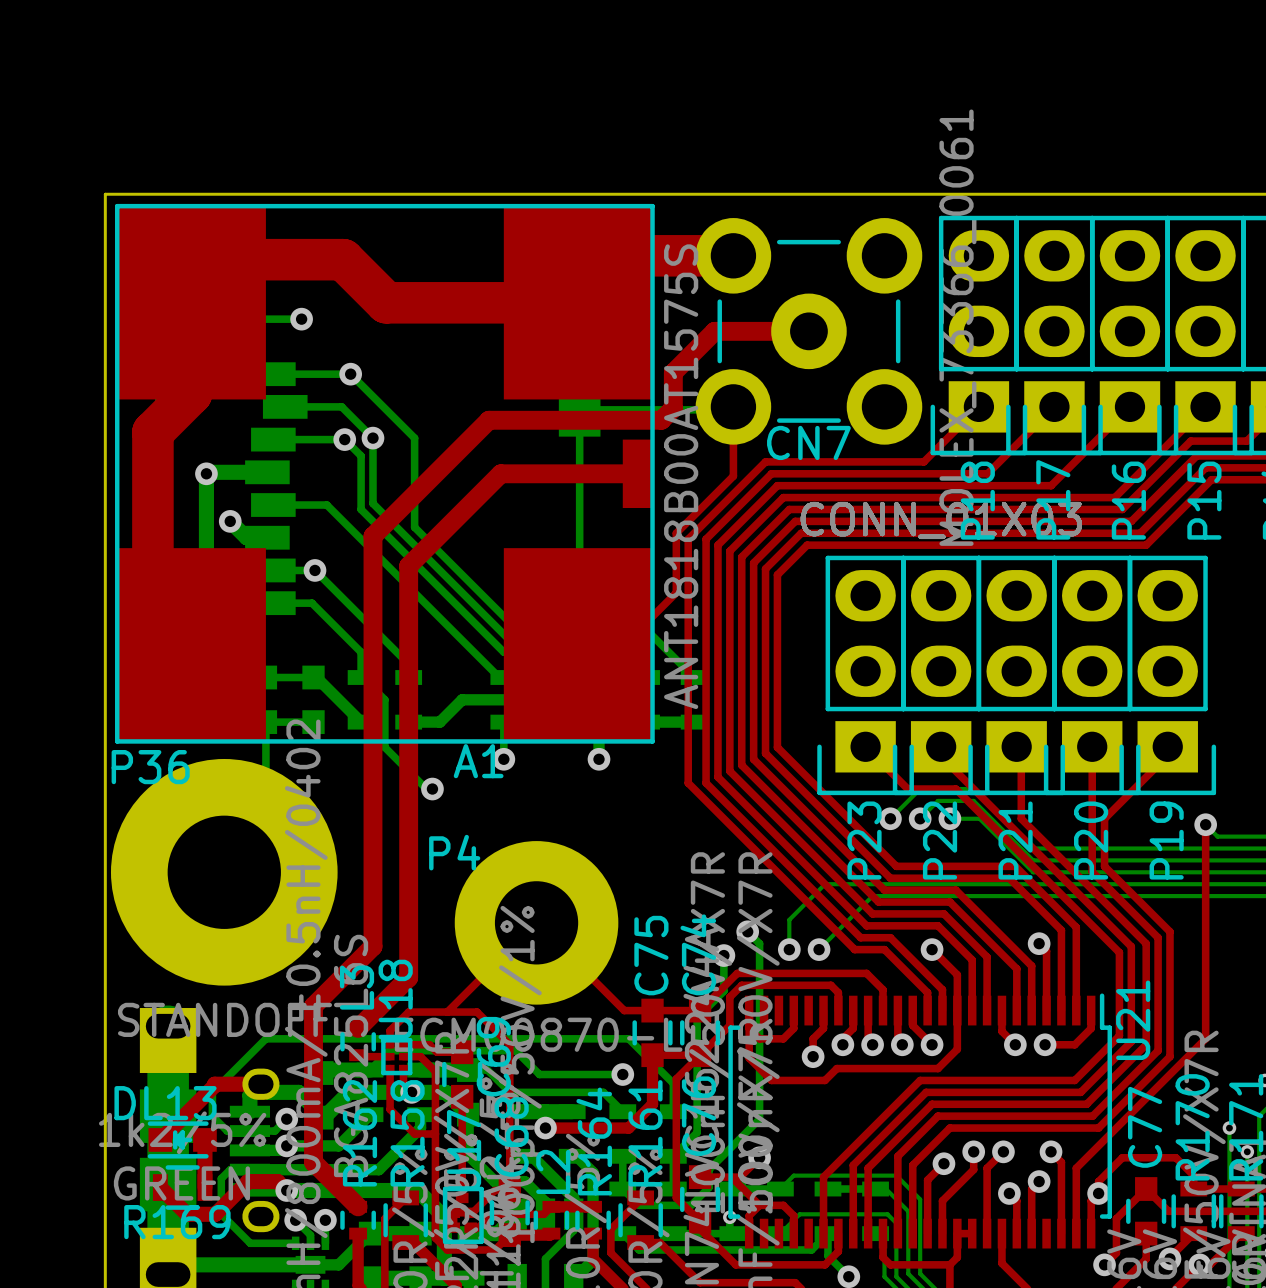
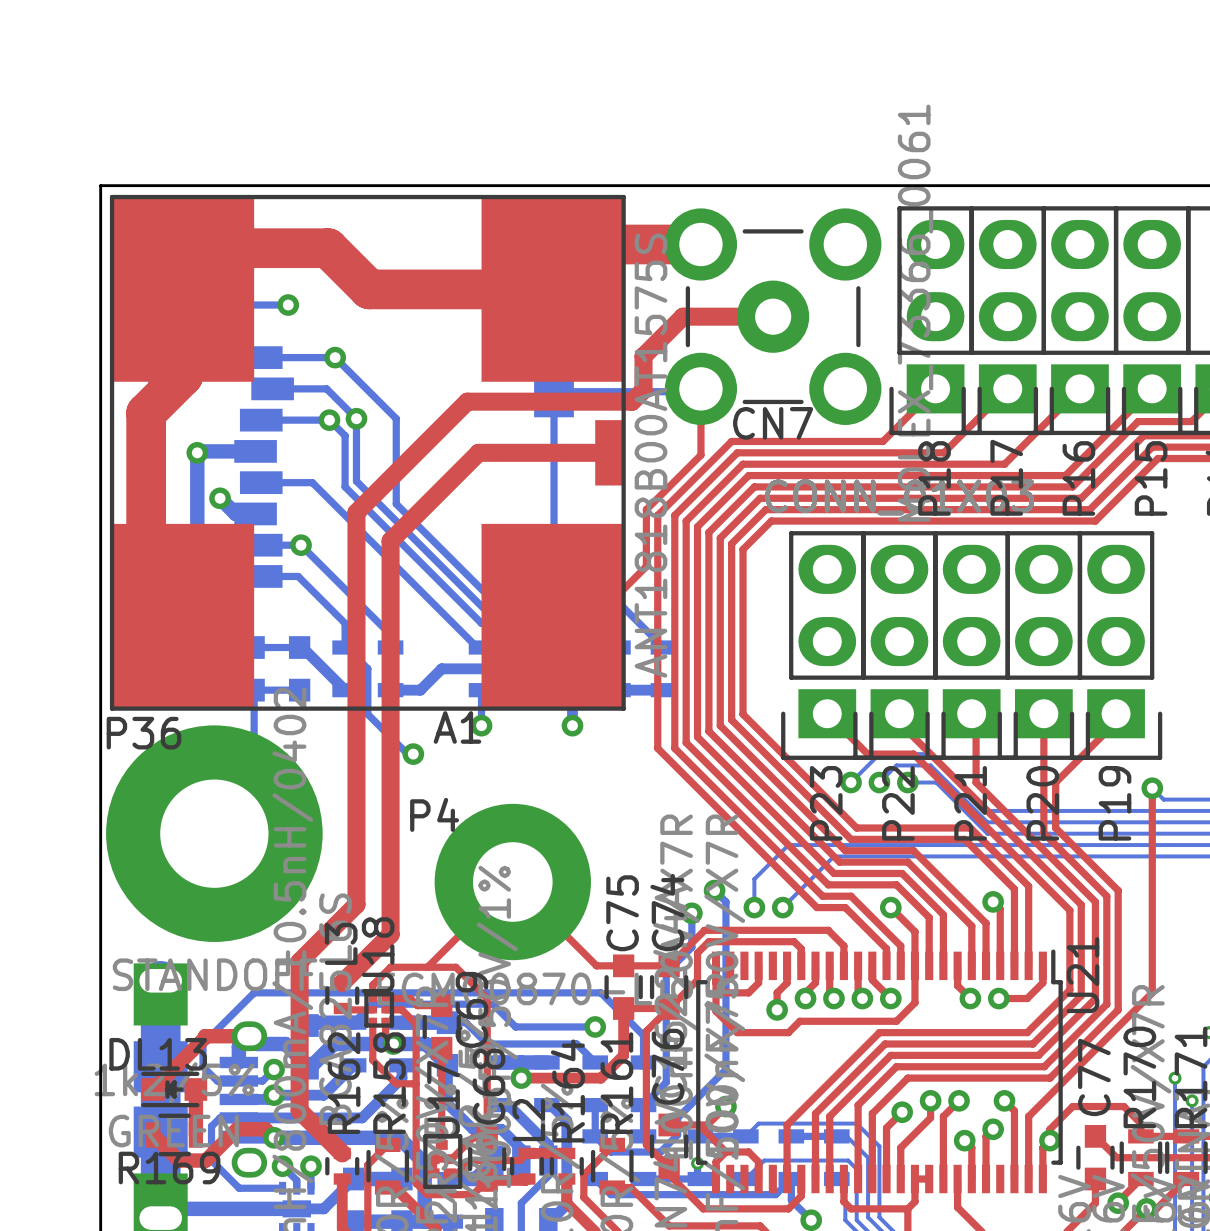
top track: (1146, 1189) (1116, 1218) (1116, 1252) (1104, 1264) -> none
via: (1104, 1264) -> none

